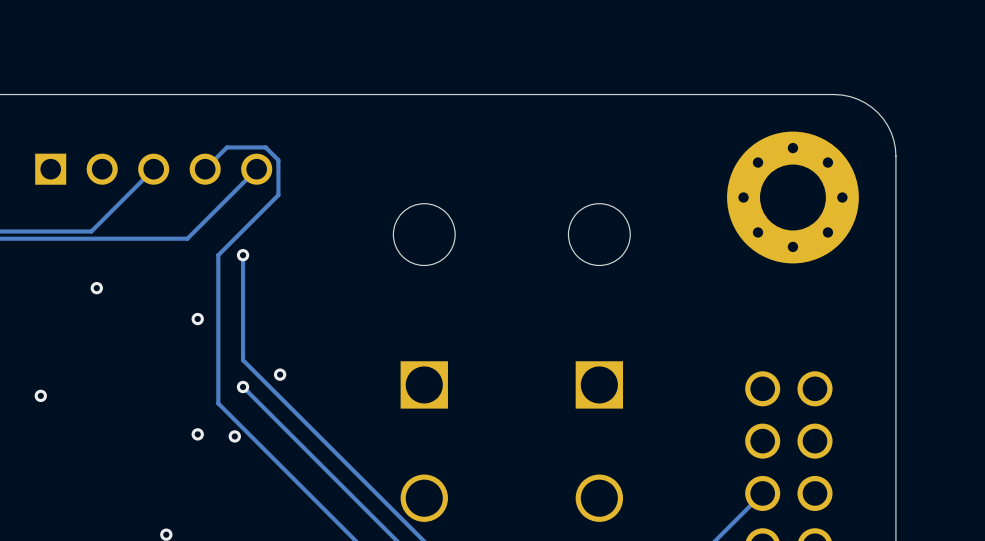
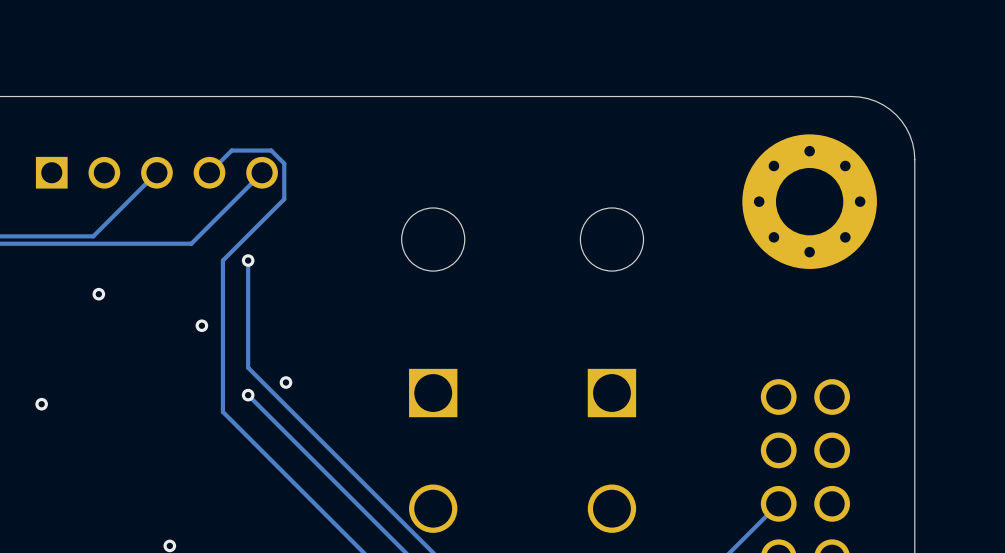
via: (197, 434) -> none
via: (234, 436) -> none

